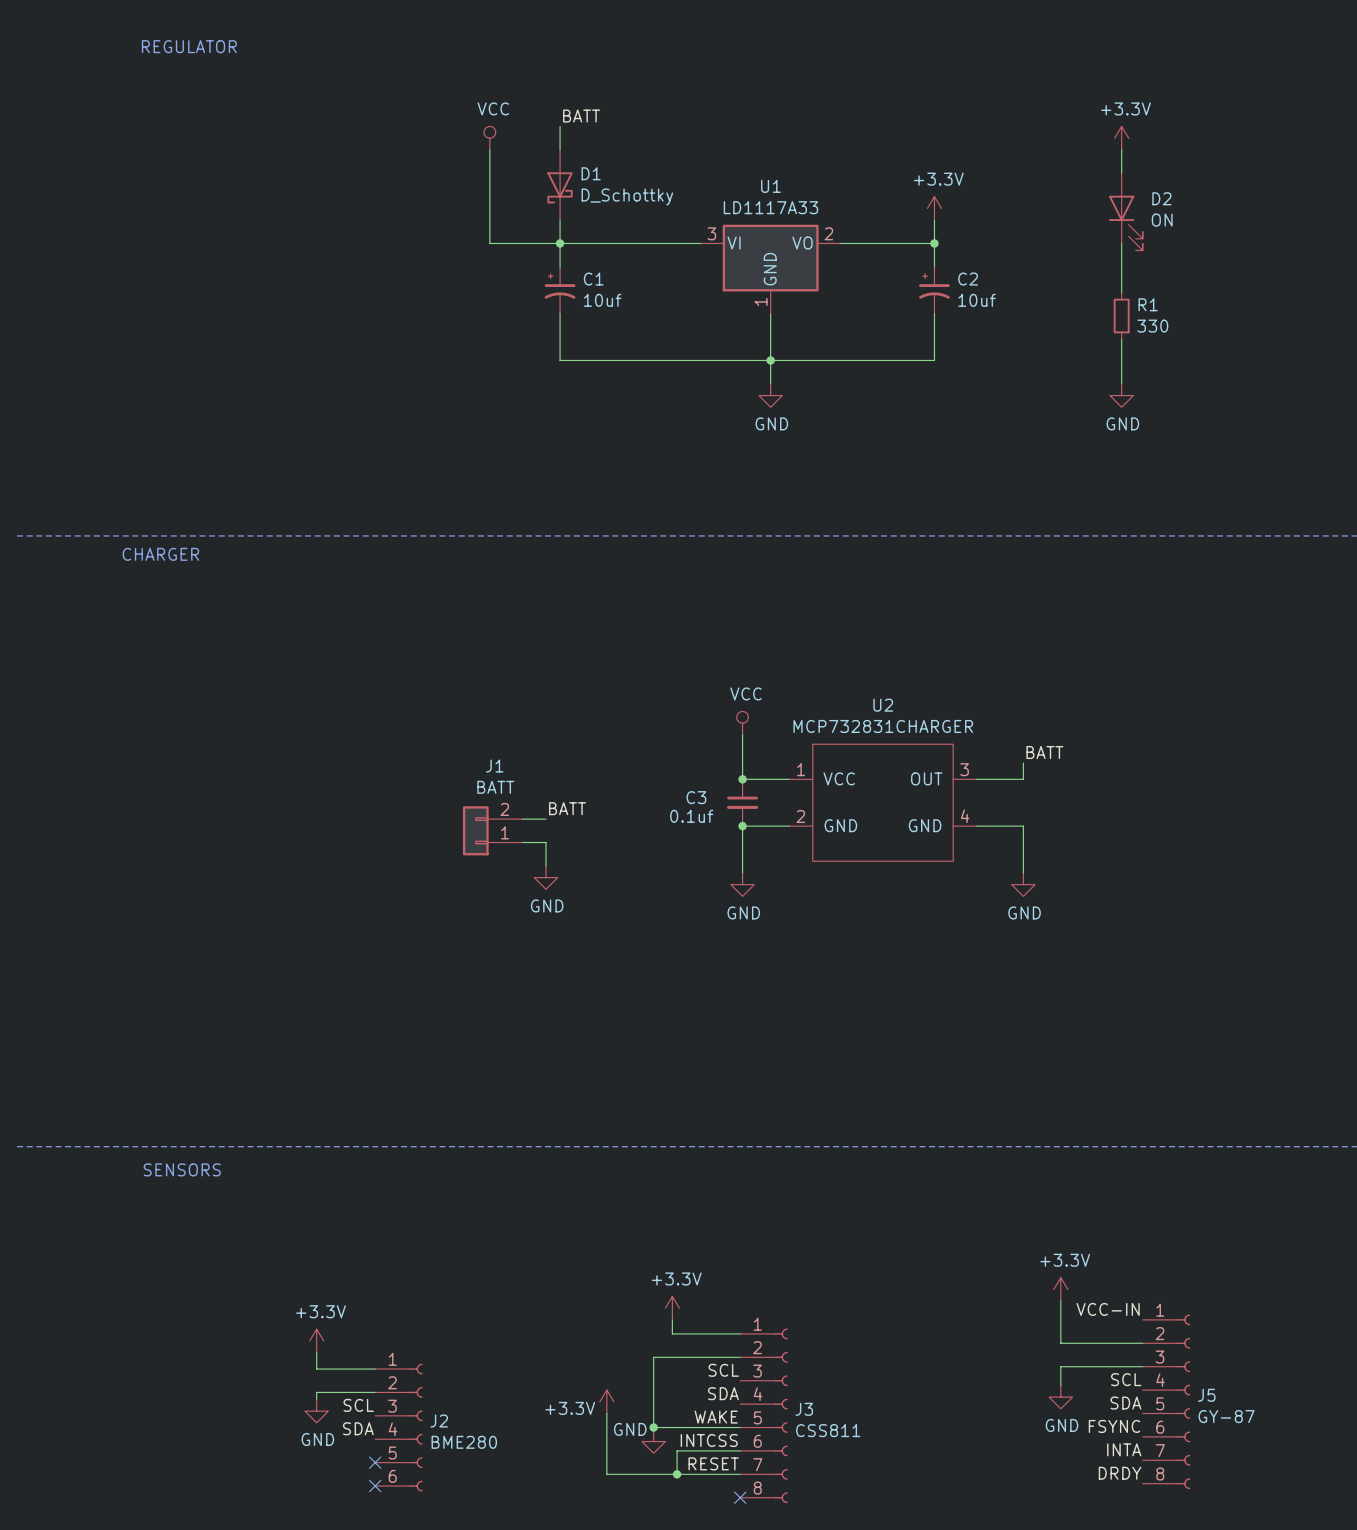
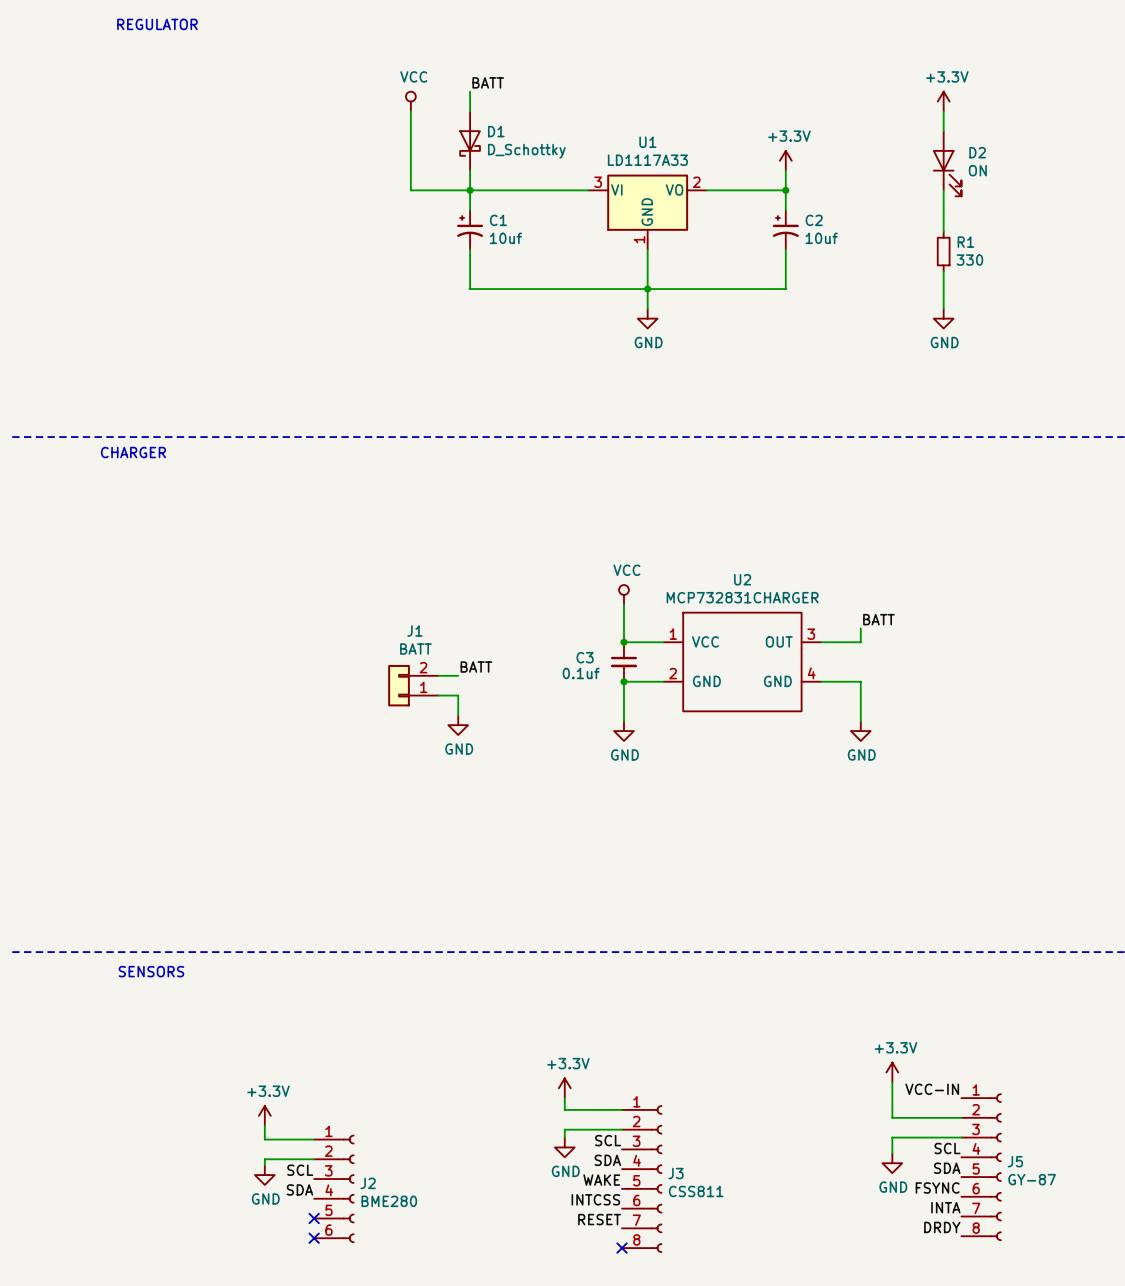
wire: (672, 1357) (653, 1357) (653, 1429) -> (564, 1129) (564, 1137)
power symbol: +3.3V (606, 1401) -> none
wire: (606, 1413) (606, 1474) (740, 1474) -> none
wire: (653, 1427) (740, 1427) -> none
junction: (653, 1427) -> none
power symbol text position: GND (630, 1429) -> GND (565, 1171)
power symbol position: GND (653, 1441) -> GND (564, 1147)
wire: (740, 1450) (677, 1450) (677, 1474) -> none
junction: (677, 1474) -> none

